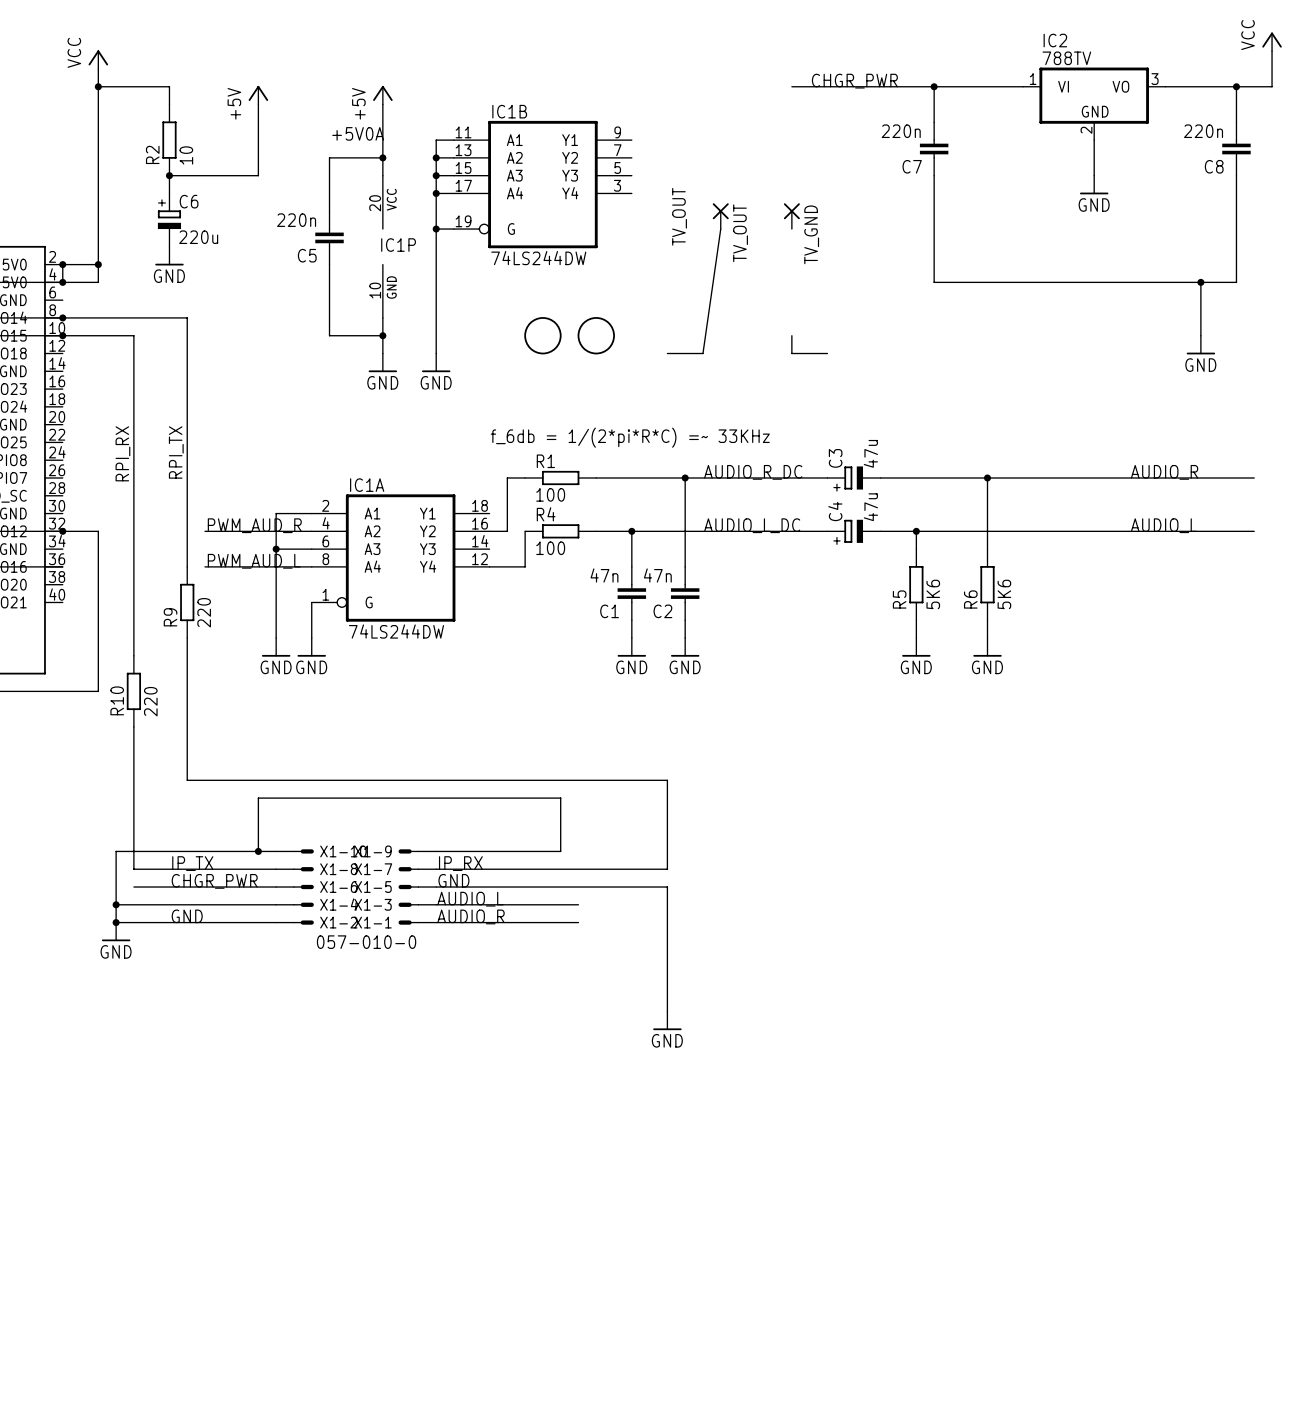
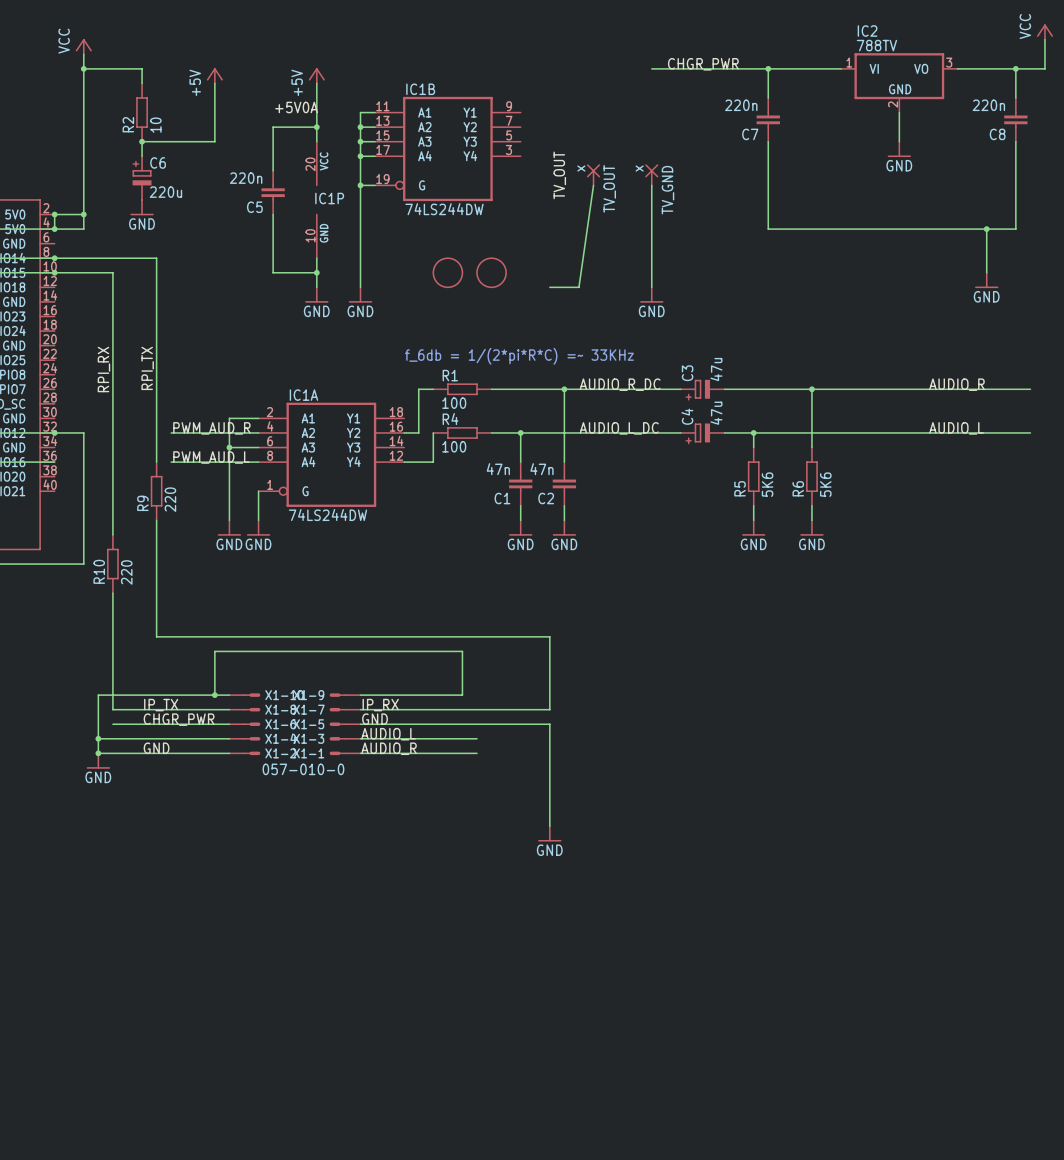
TV_OUT value: none -> x (581, 168)
TV_GND value: none -> x (639, 168)
wire: none -> (651, 185) (651, 272)
wire: (791, 353) (827, 353) -> none
power symbol: none -> GND (651, 294)

